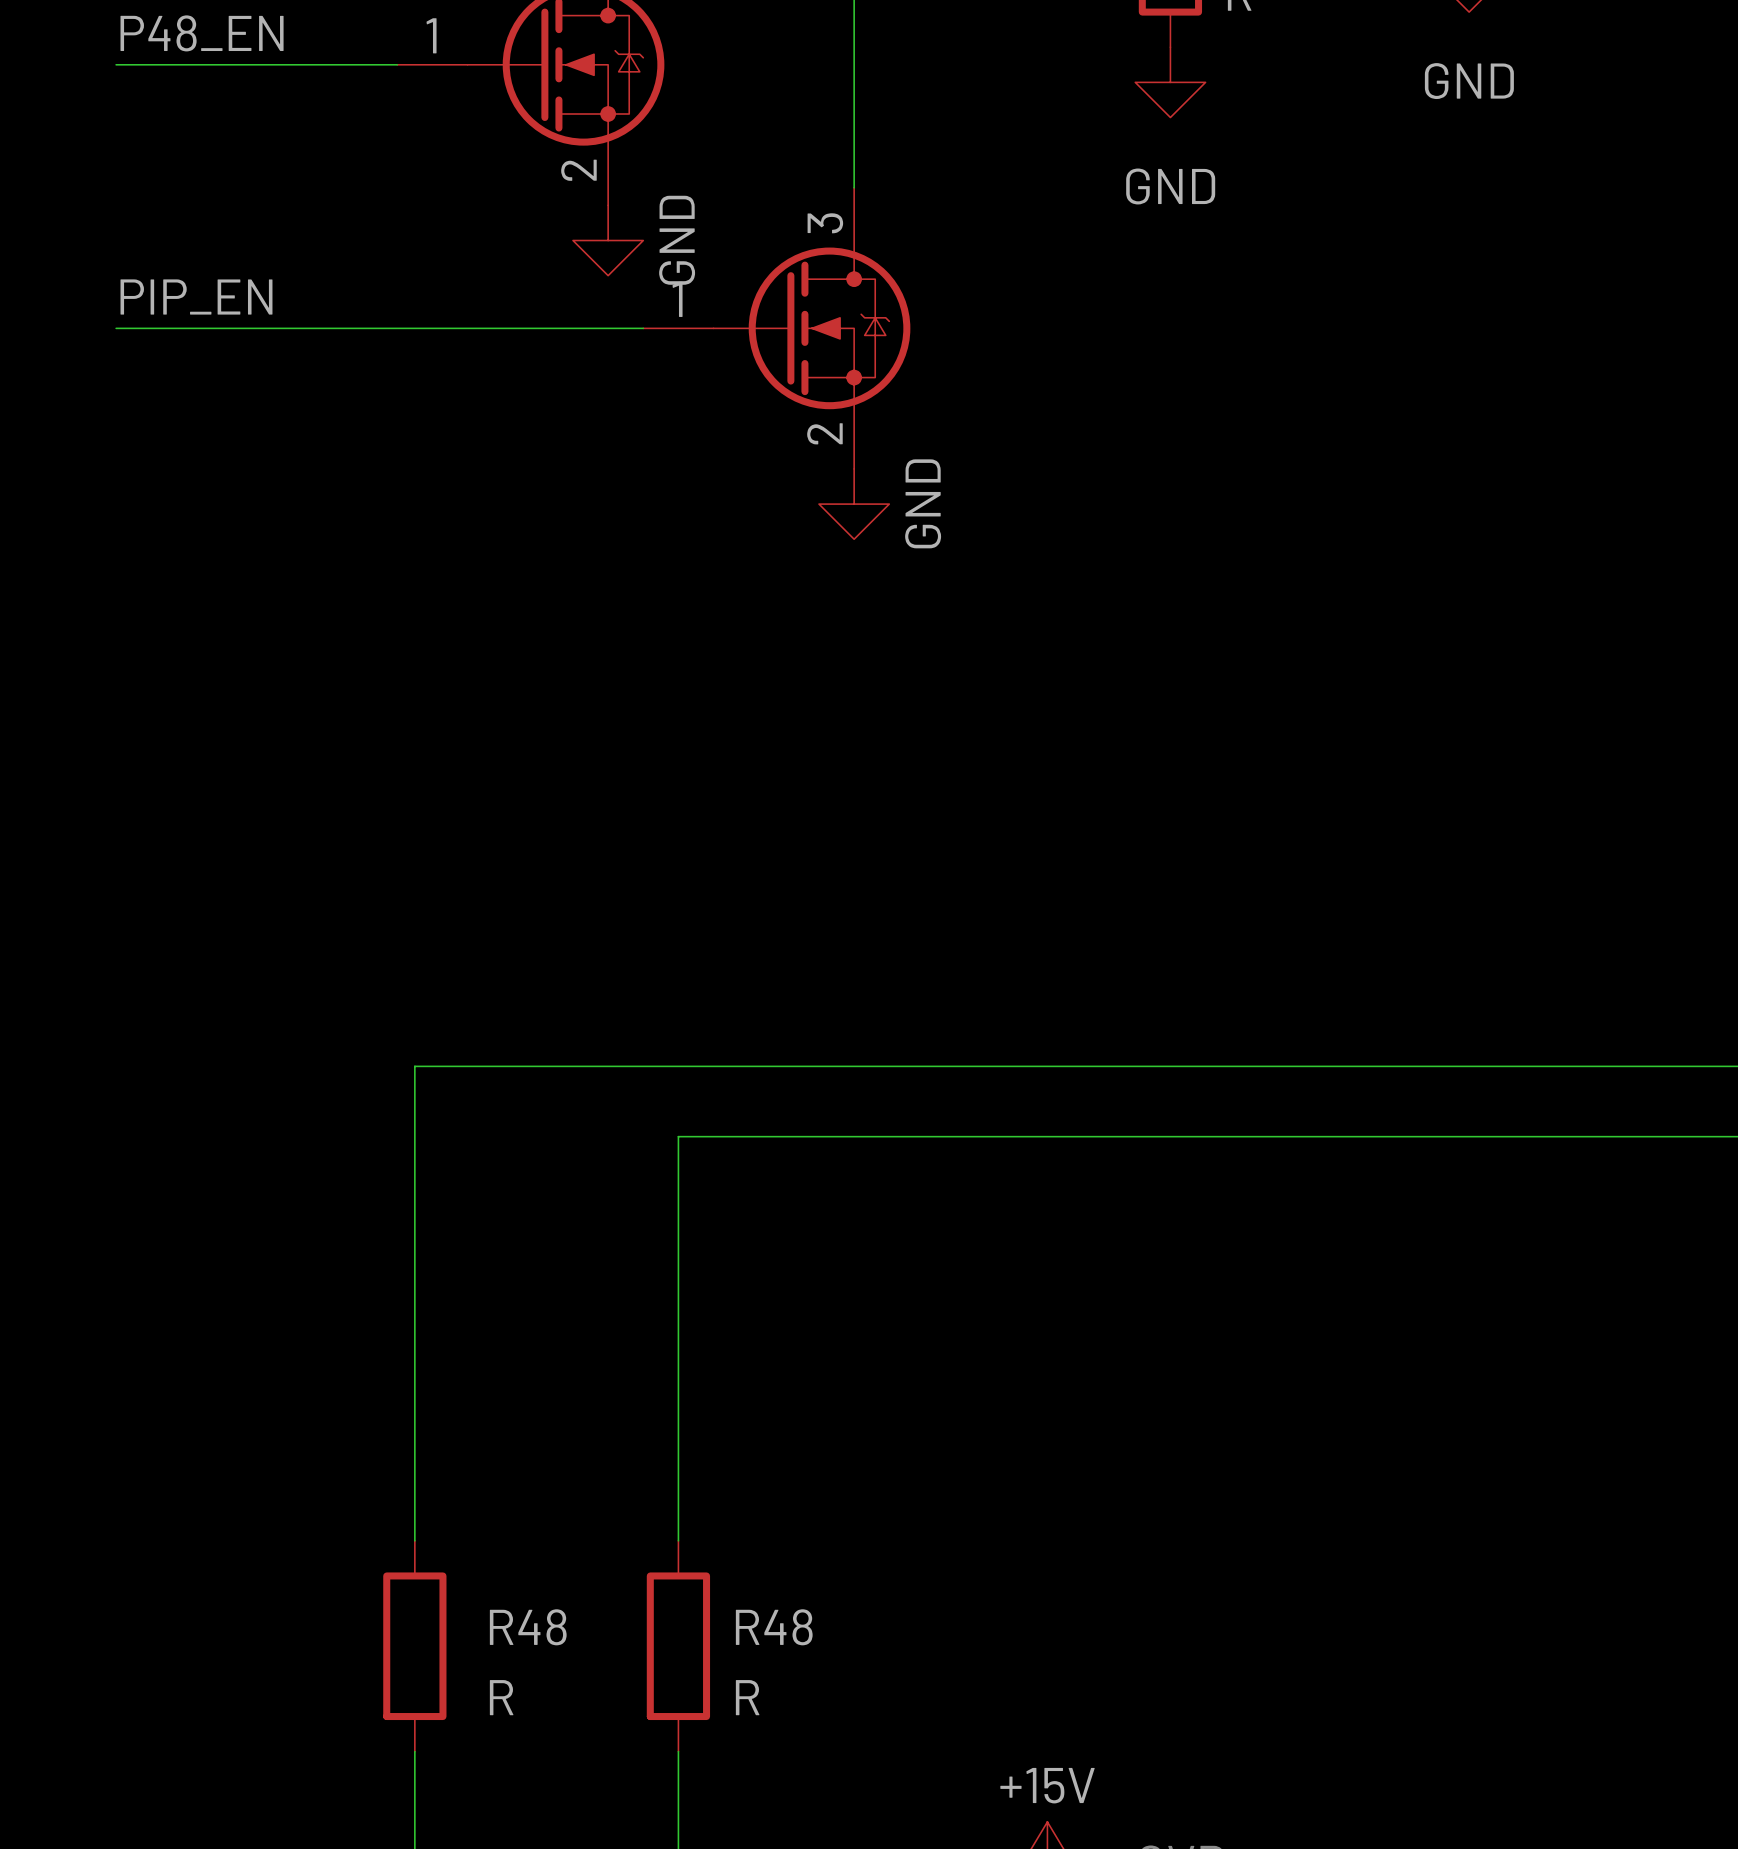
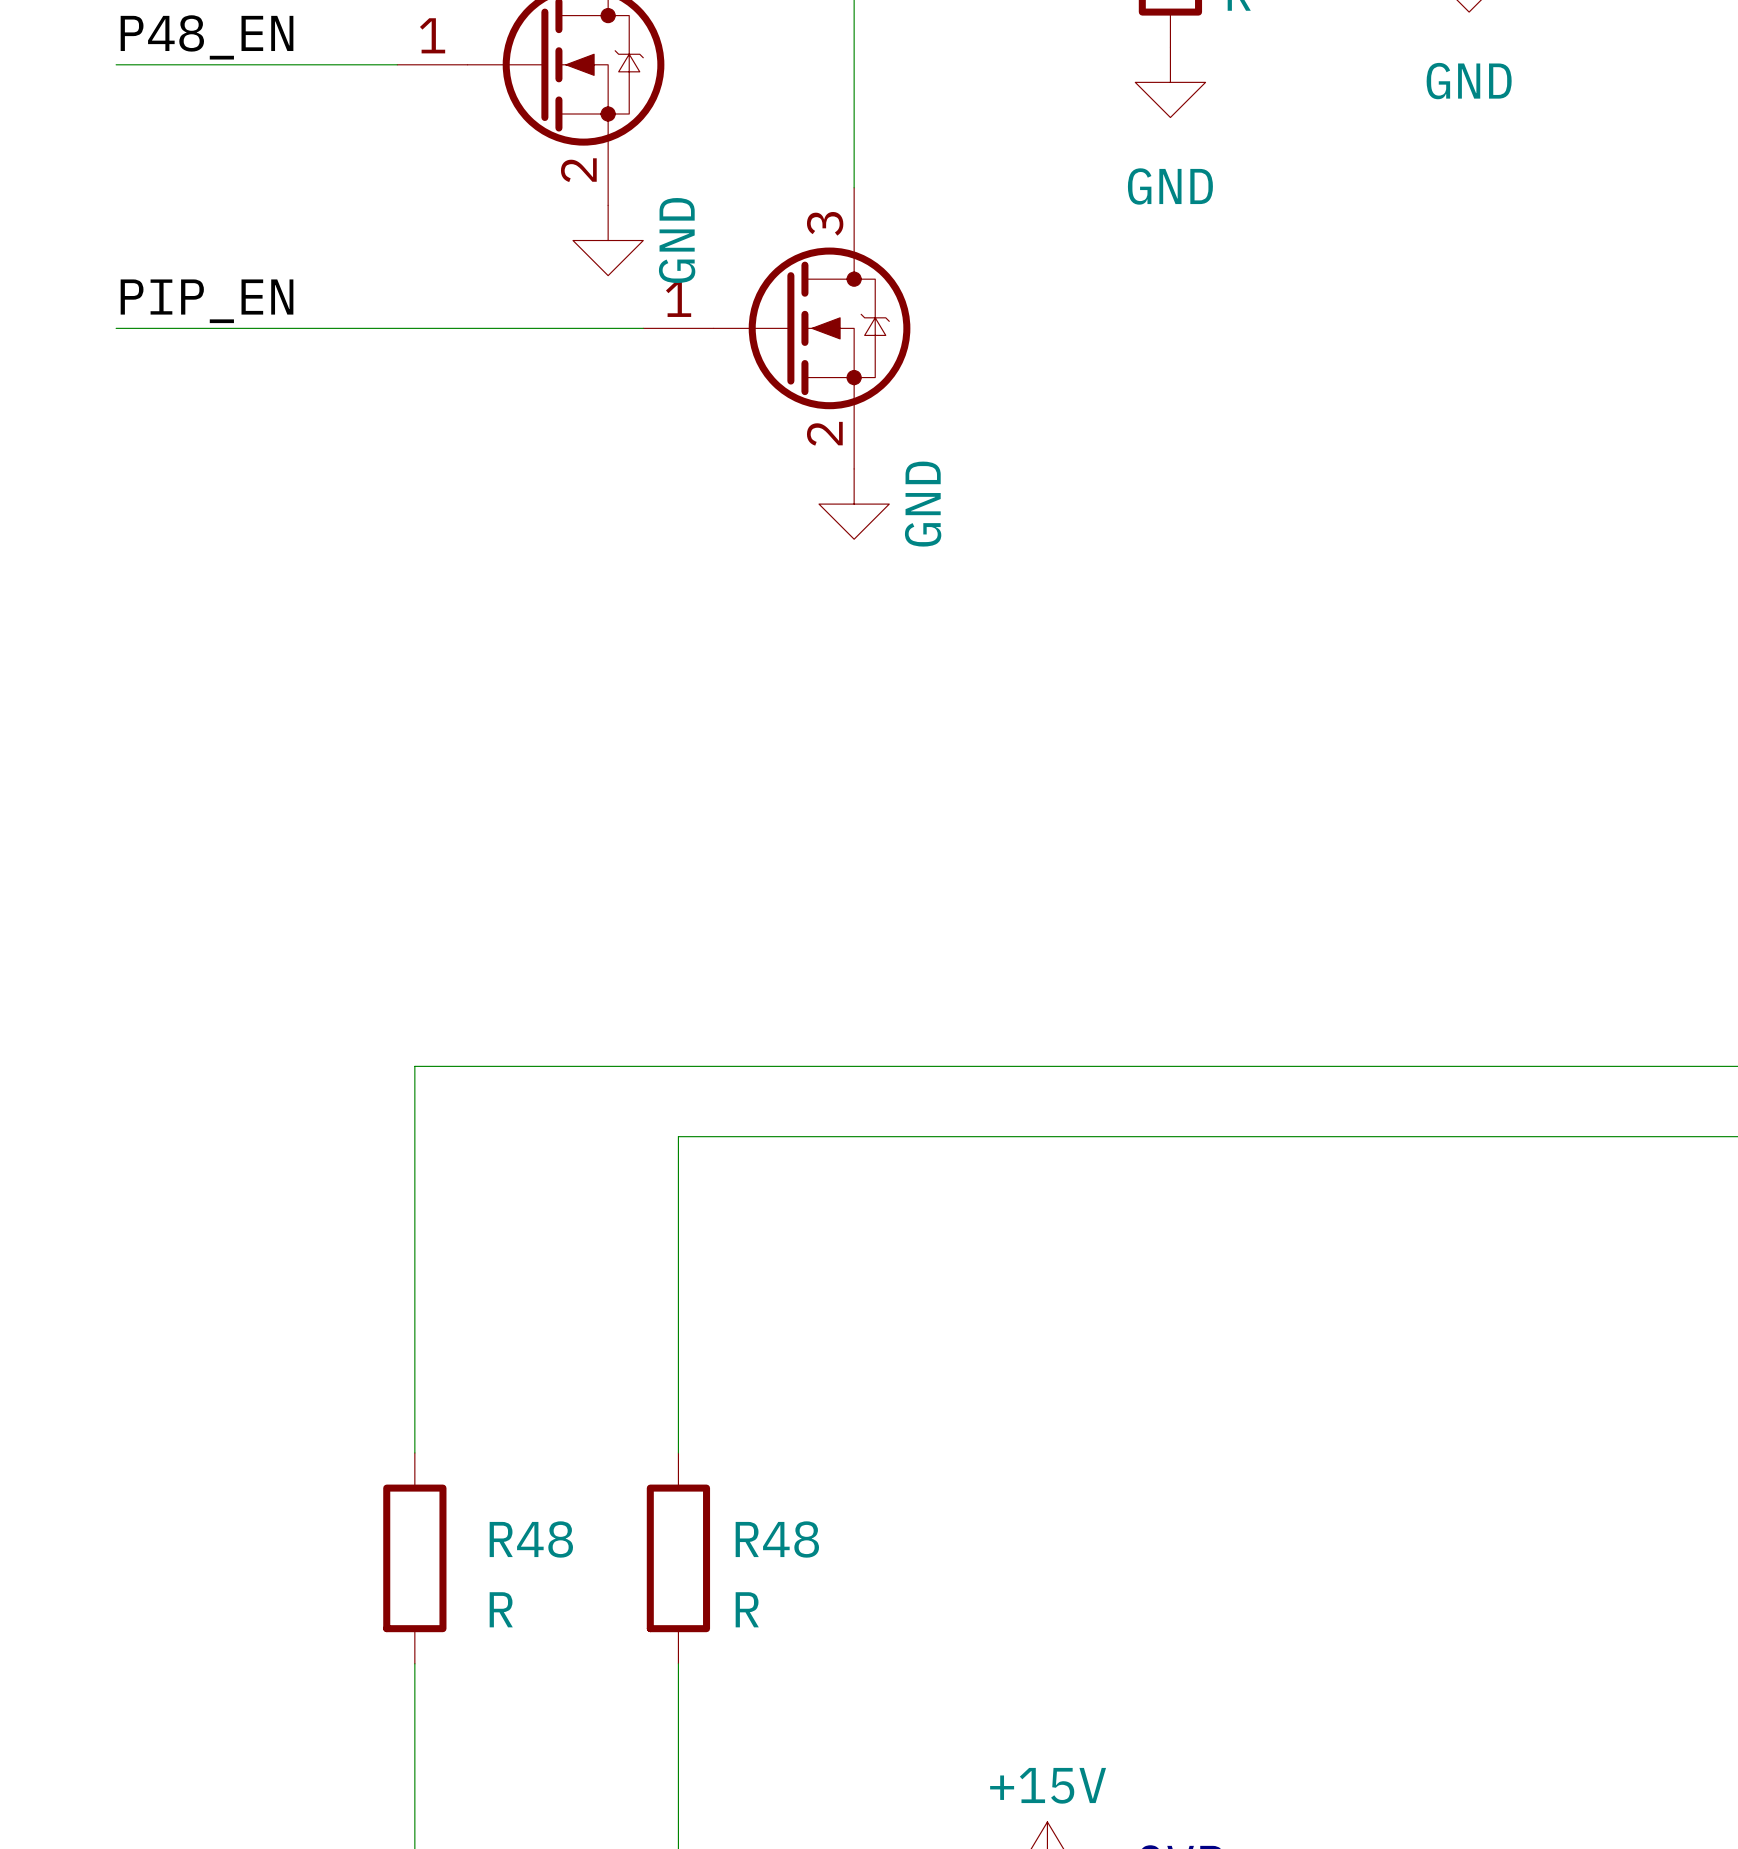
wire: (414, 1452) (414, 1540) -> (414, 1663) (414, 1751)
wire: (678, 1452) (678, 1540) -> (678, 1663) (678, 1751)
R48 position: (414, 1646) -> (414, 1558)
R48 position: (678, 1646) -> (678, 1558)

